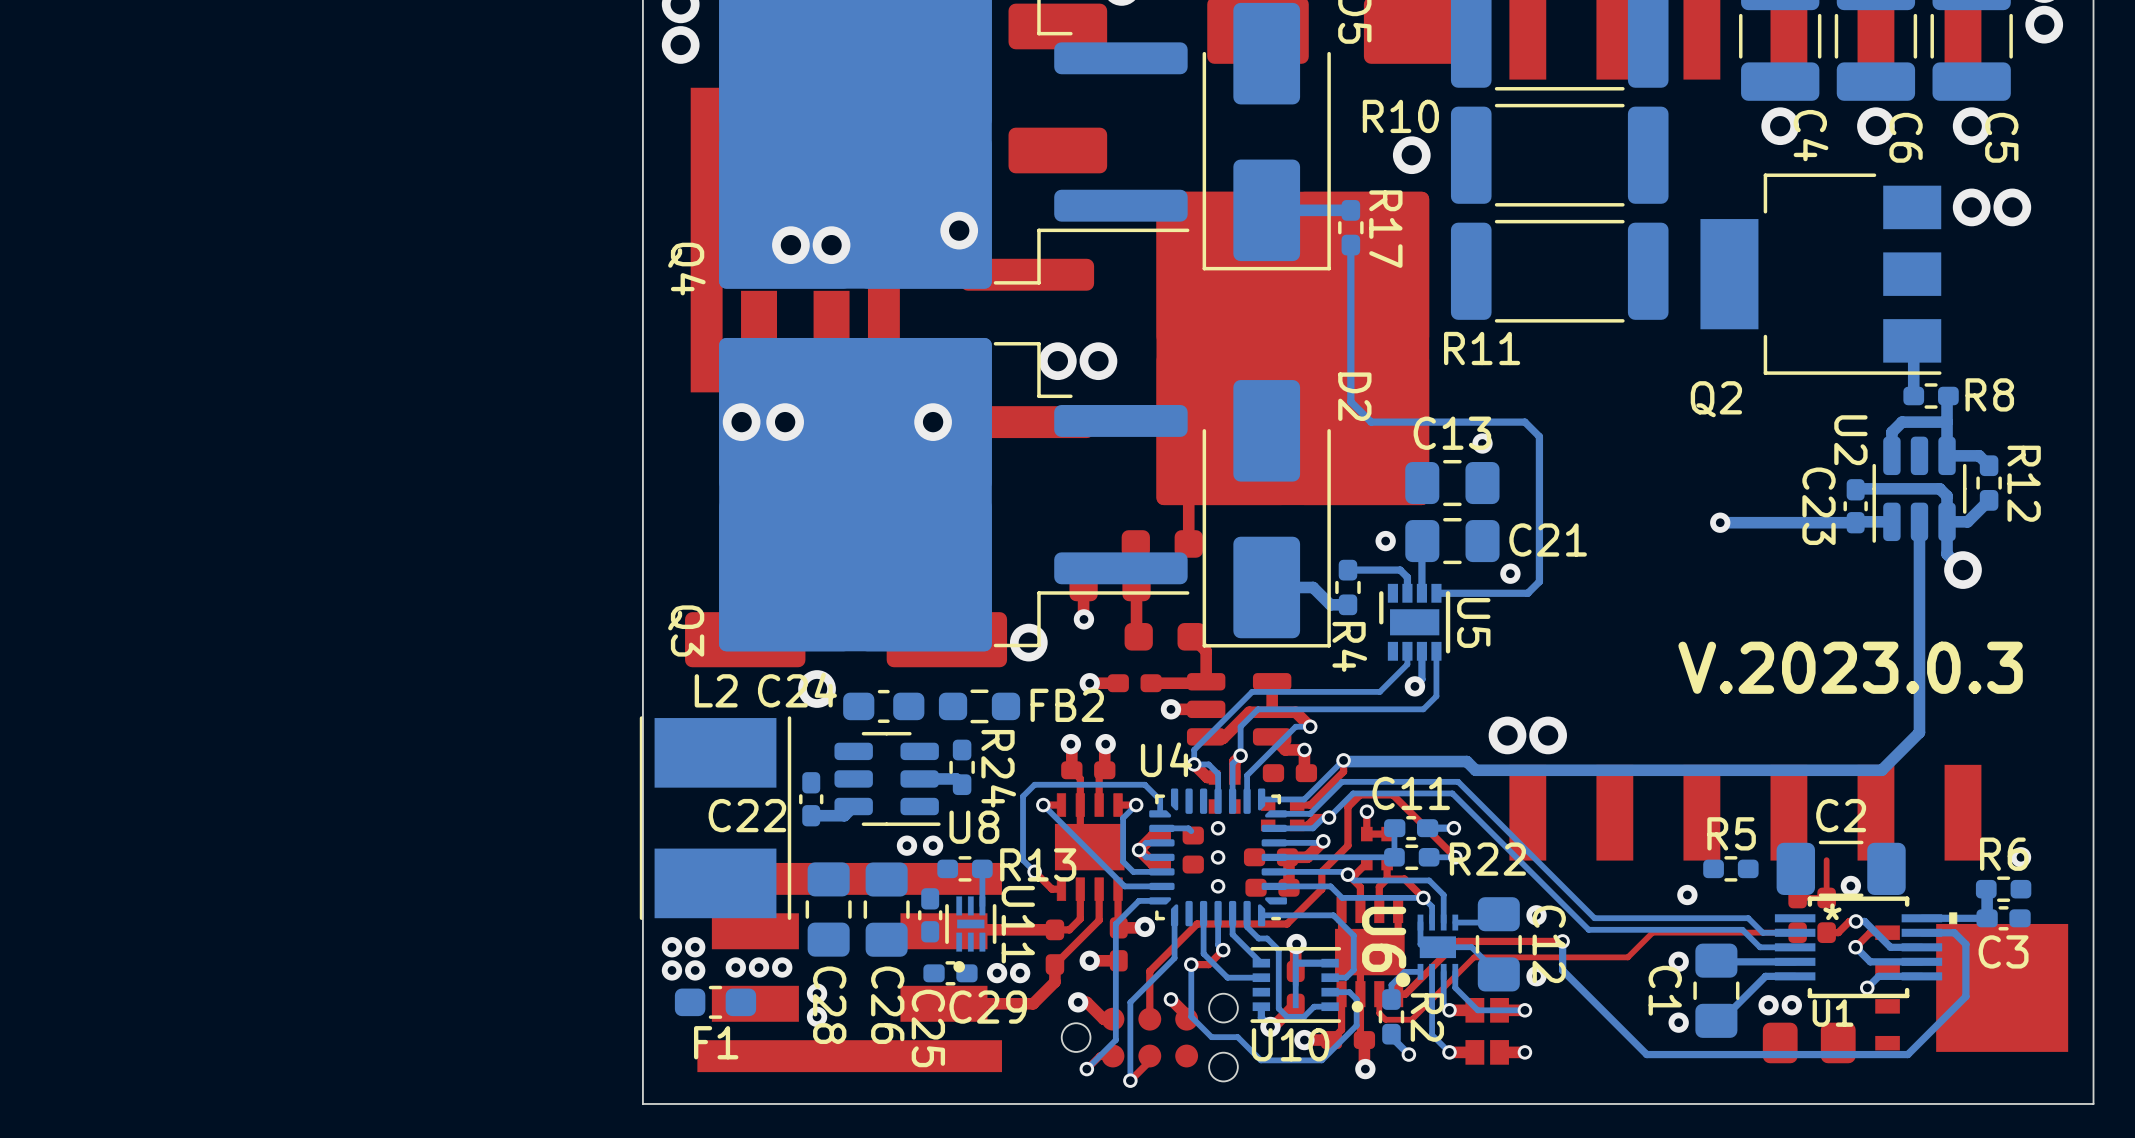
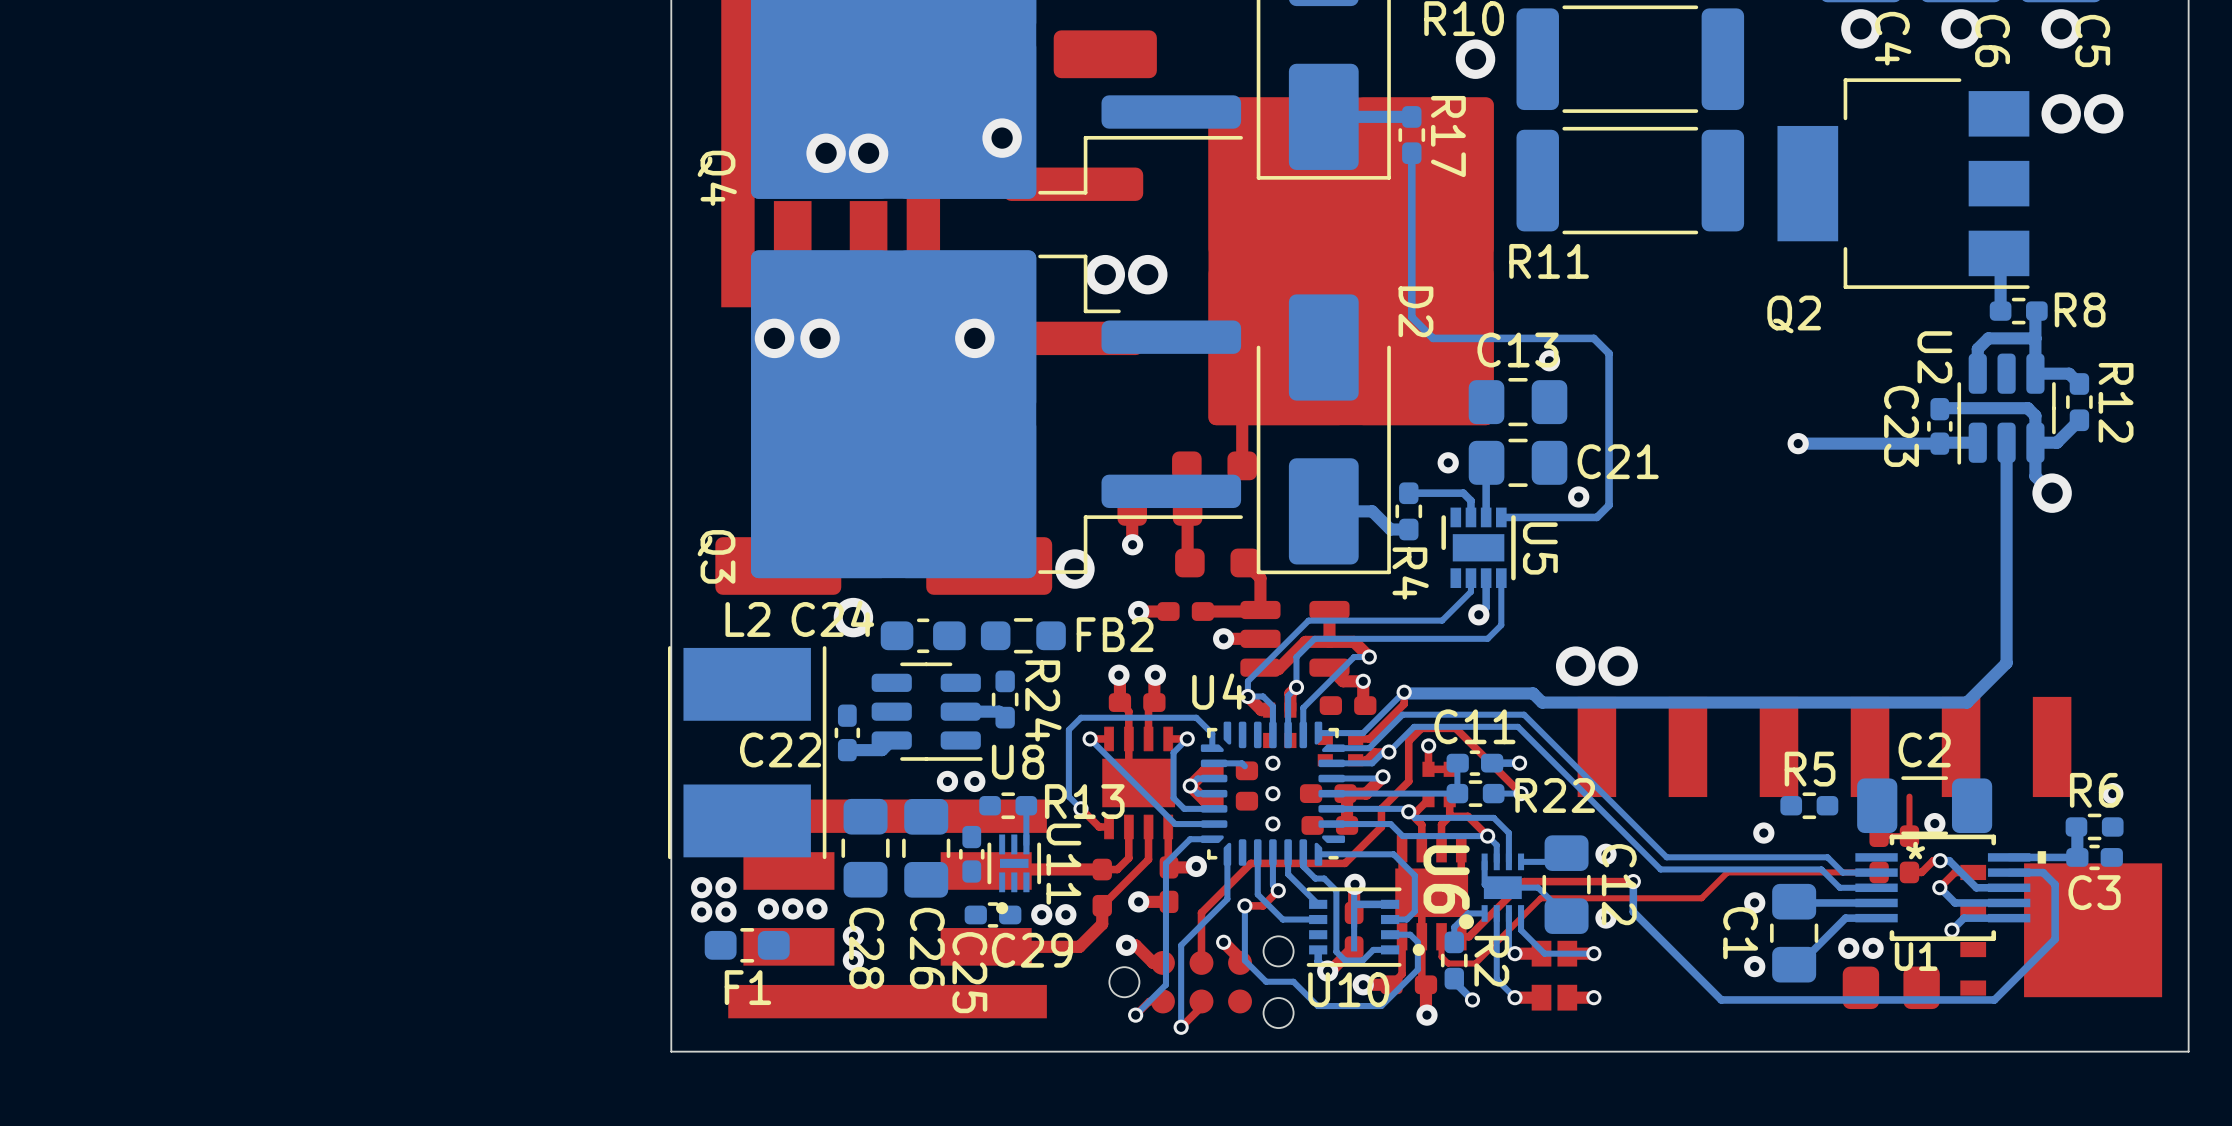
text: V.2023.0.3 (1850, 667) -> none

